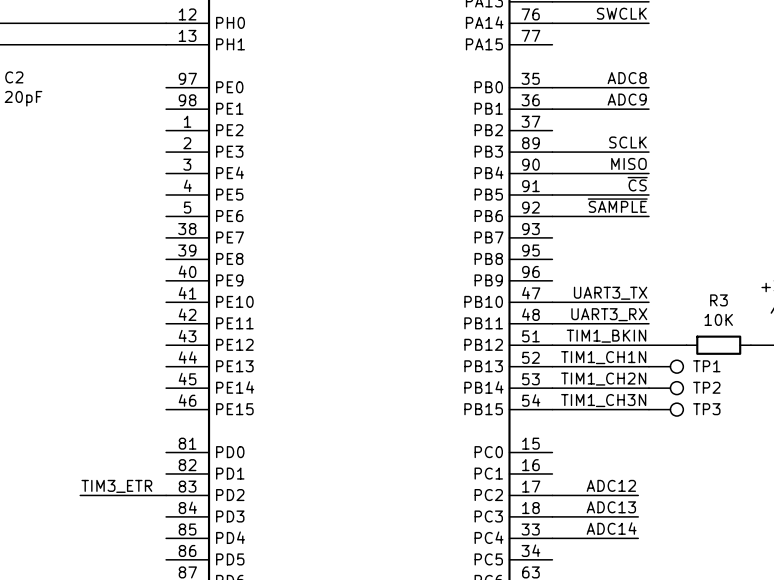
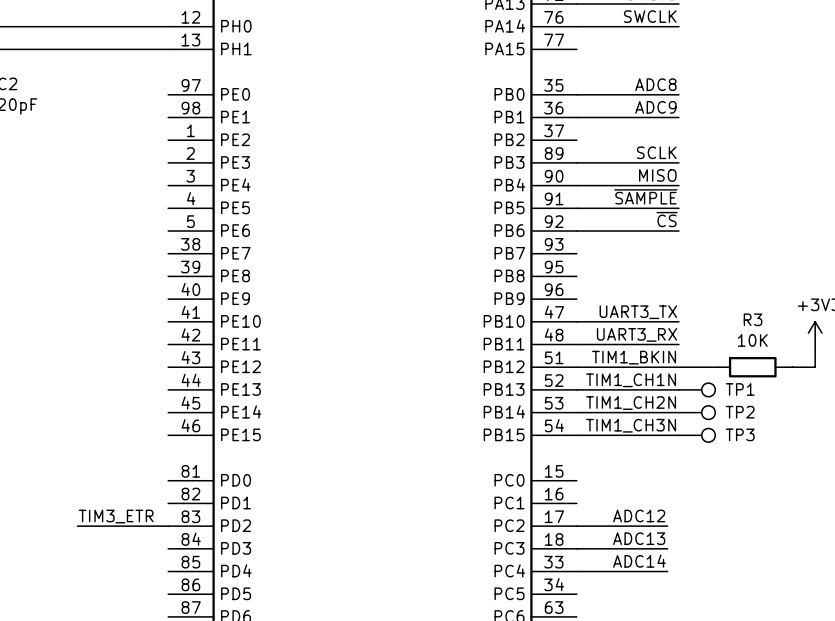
label: ~{CS} (637, 184) -> ~{SAMPLE} (645, 196)
label: ~{SAMPLE} (617, 205) -> ~{CS} (667, 219)

